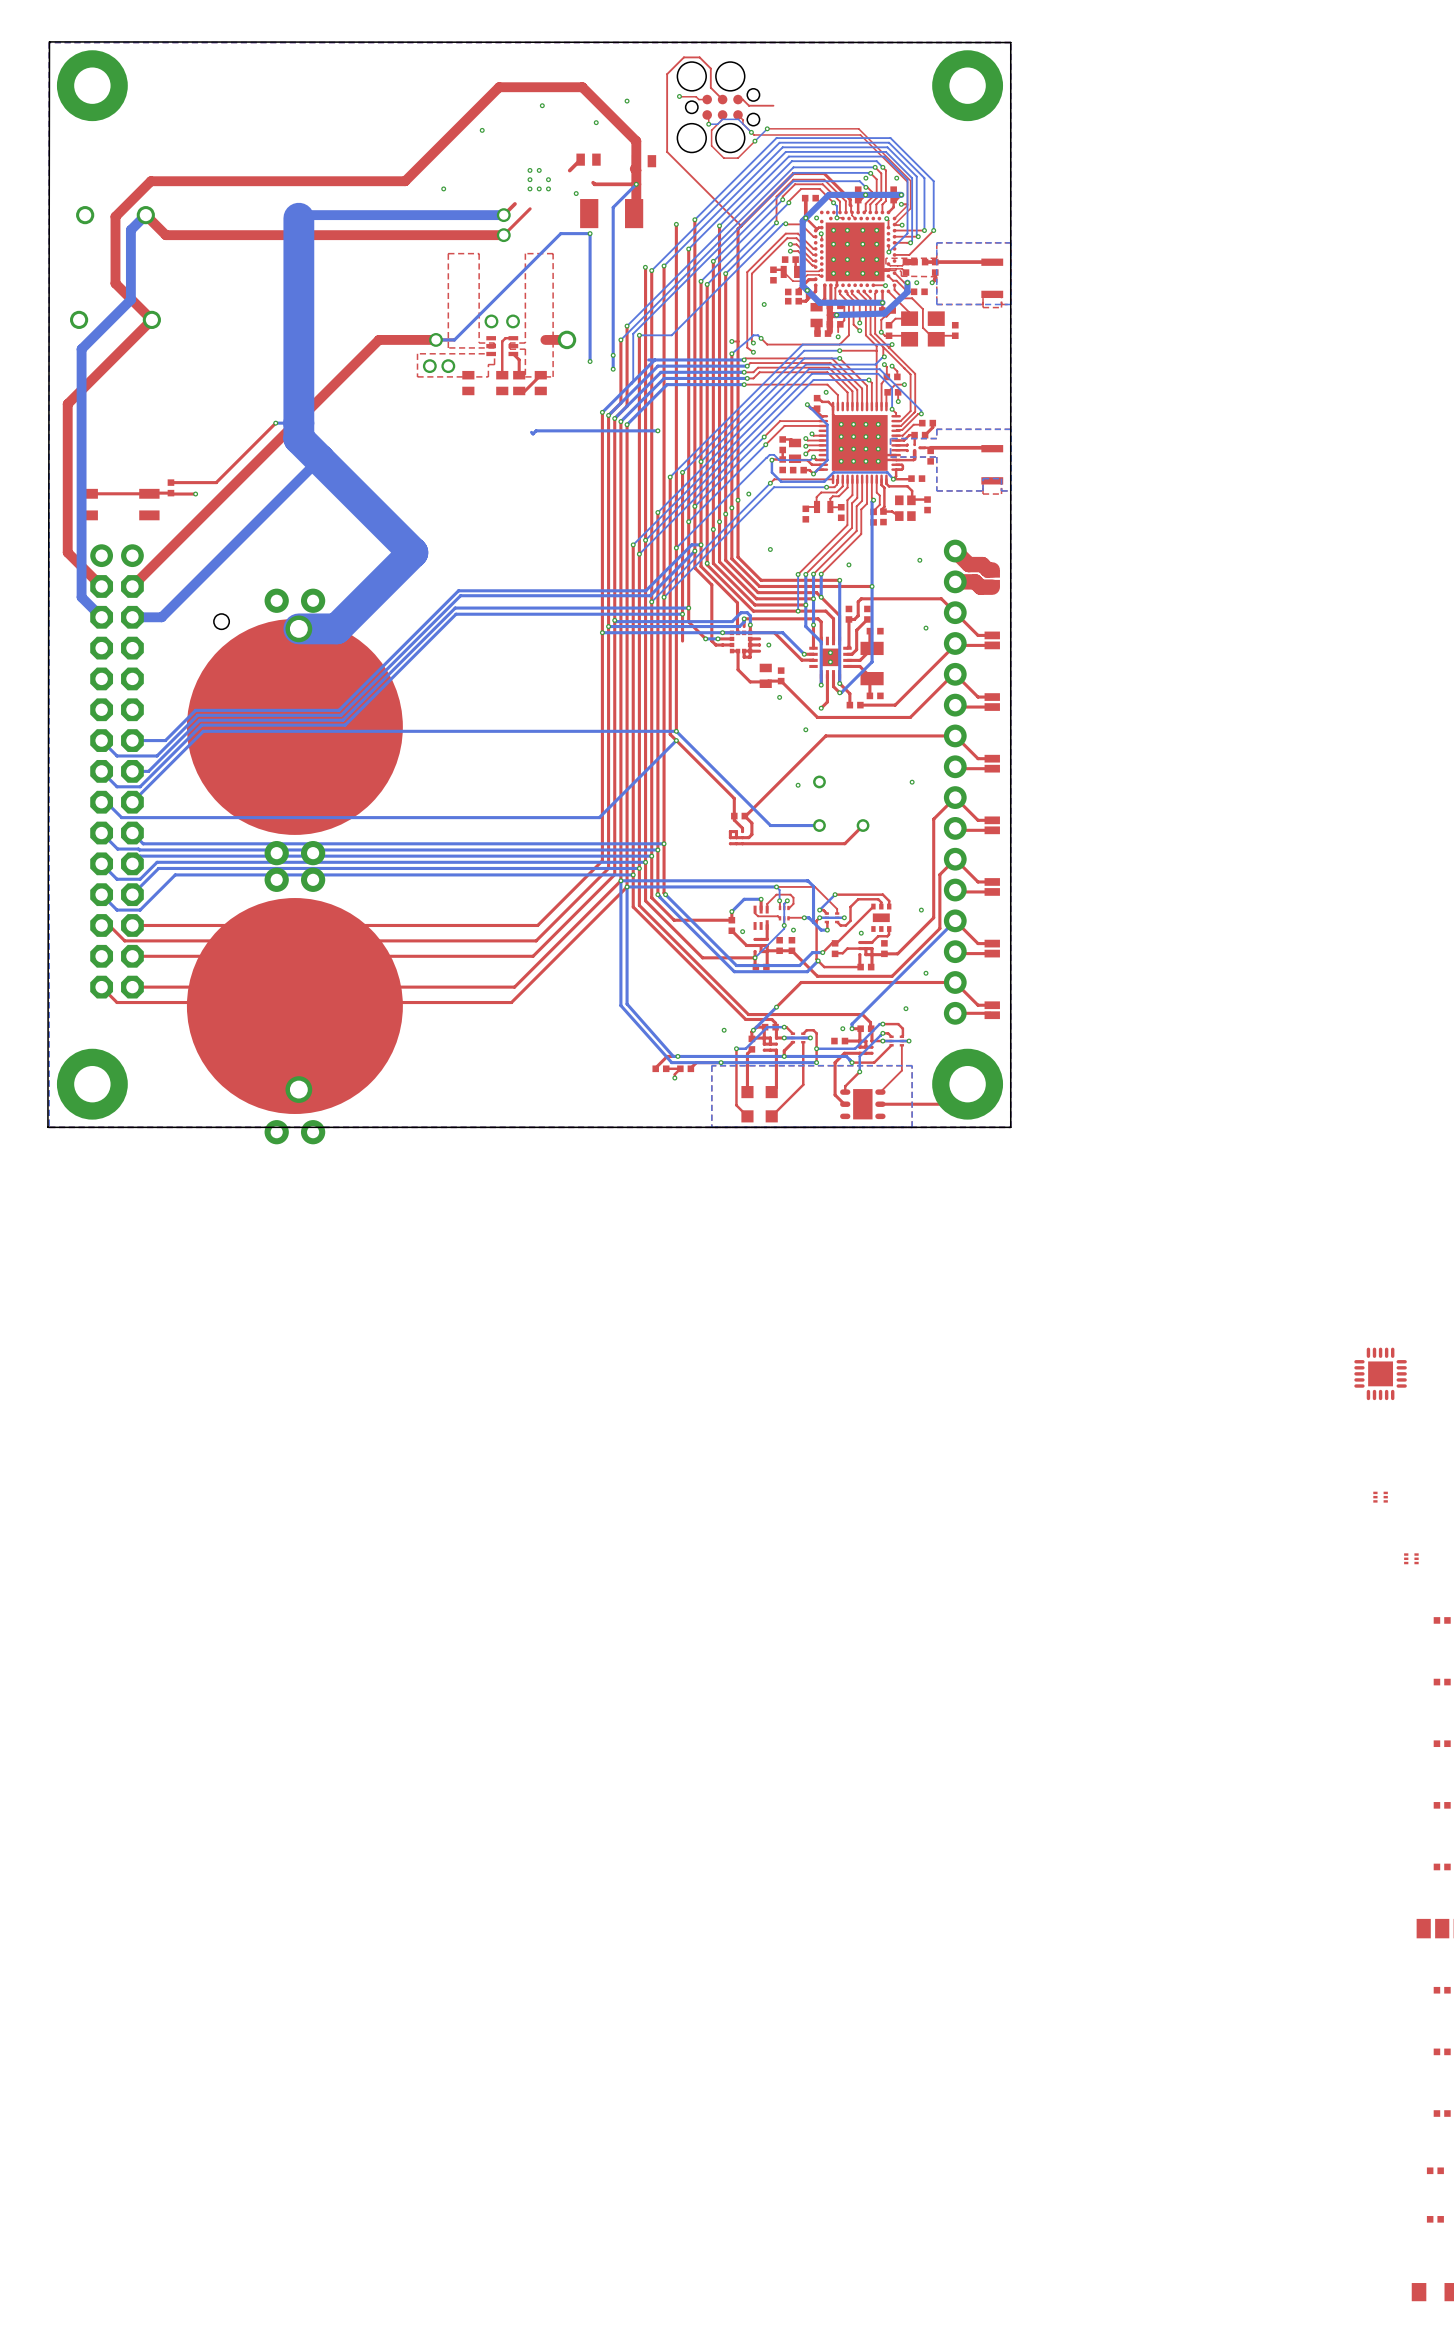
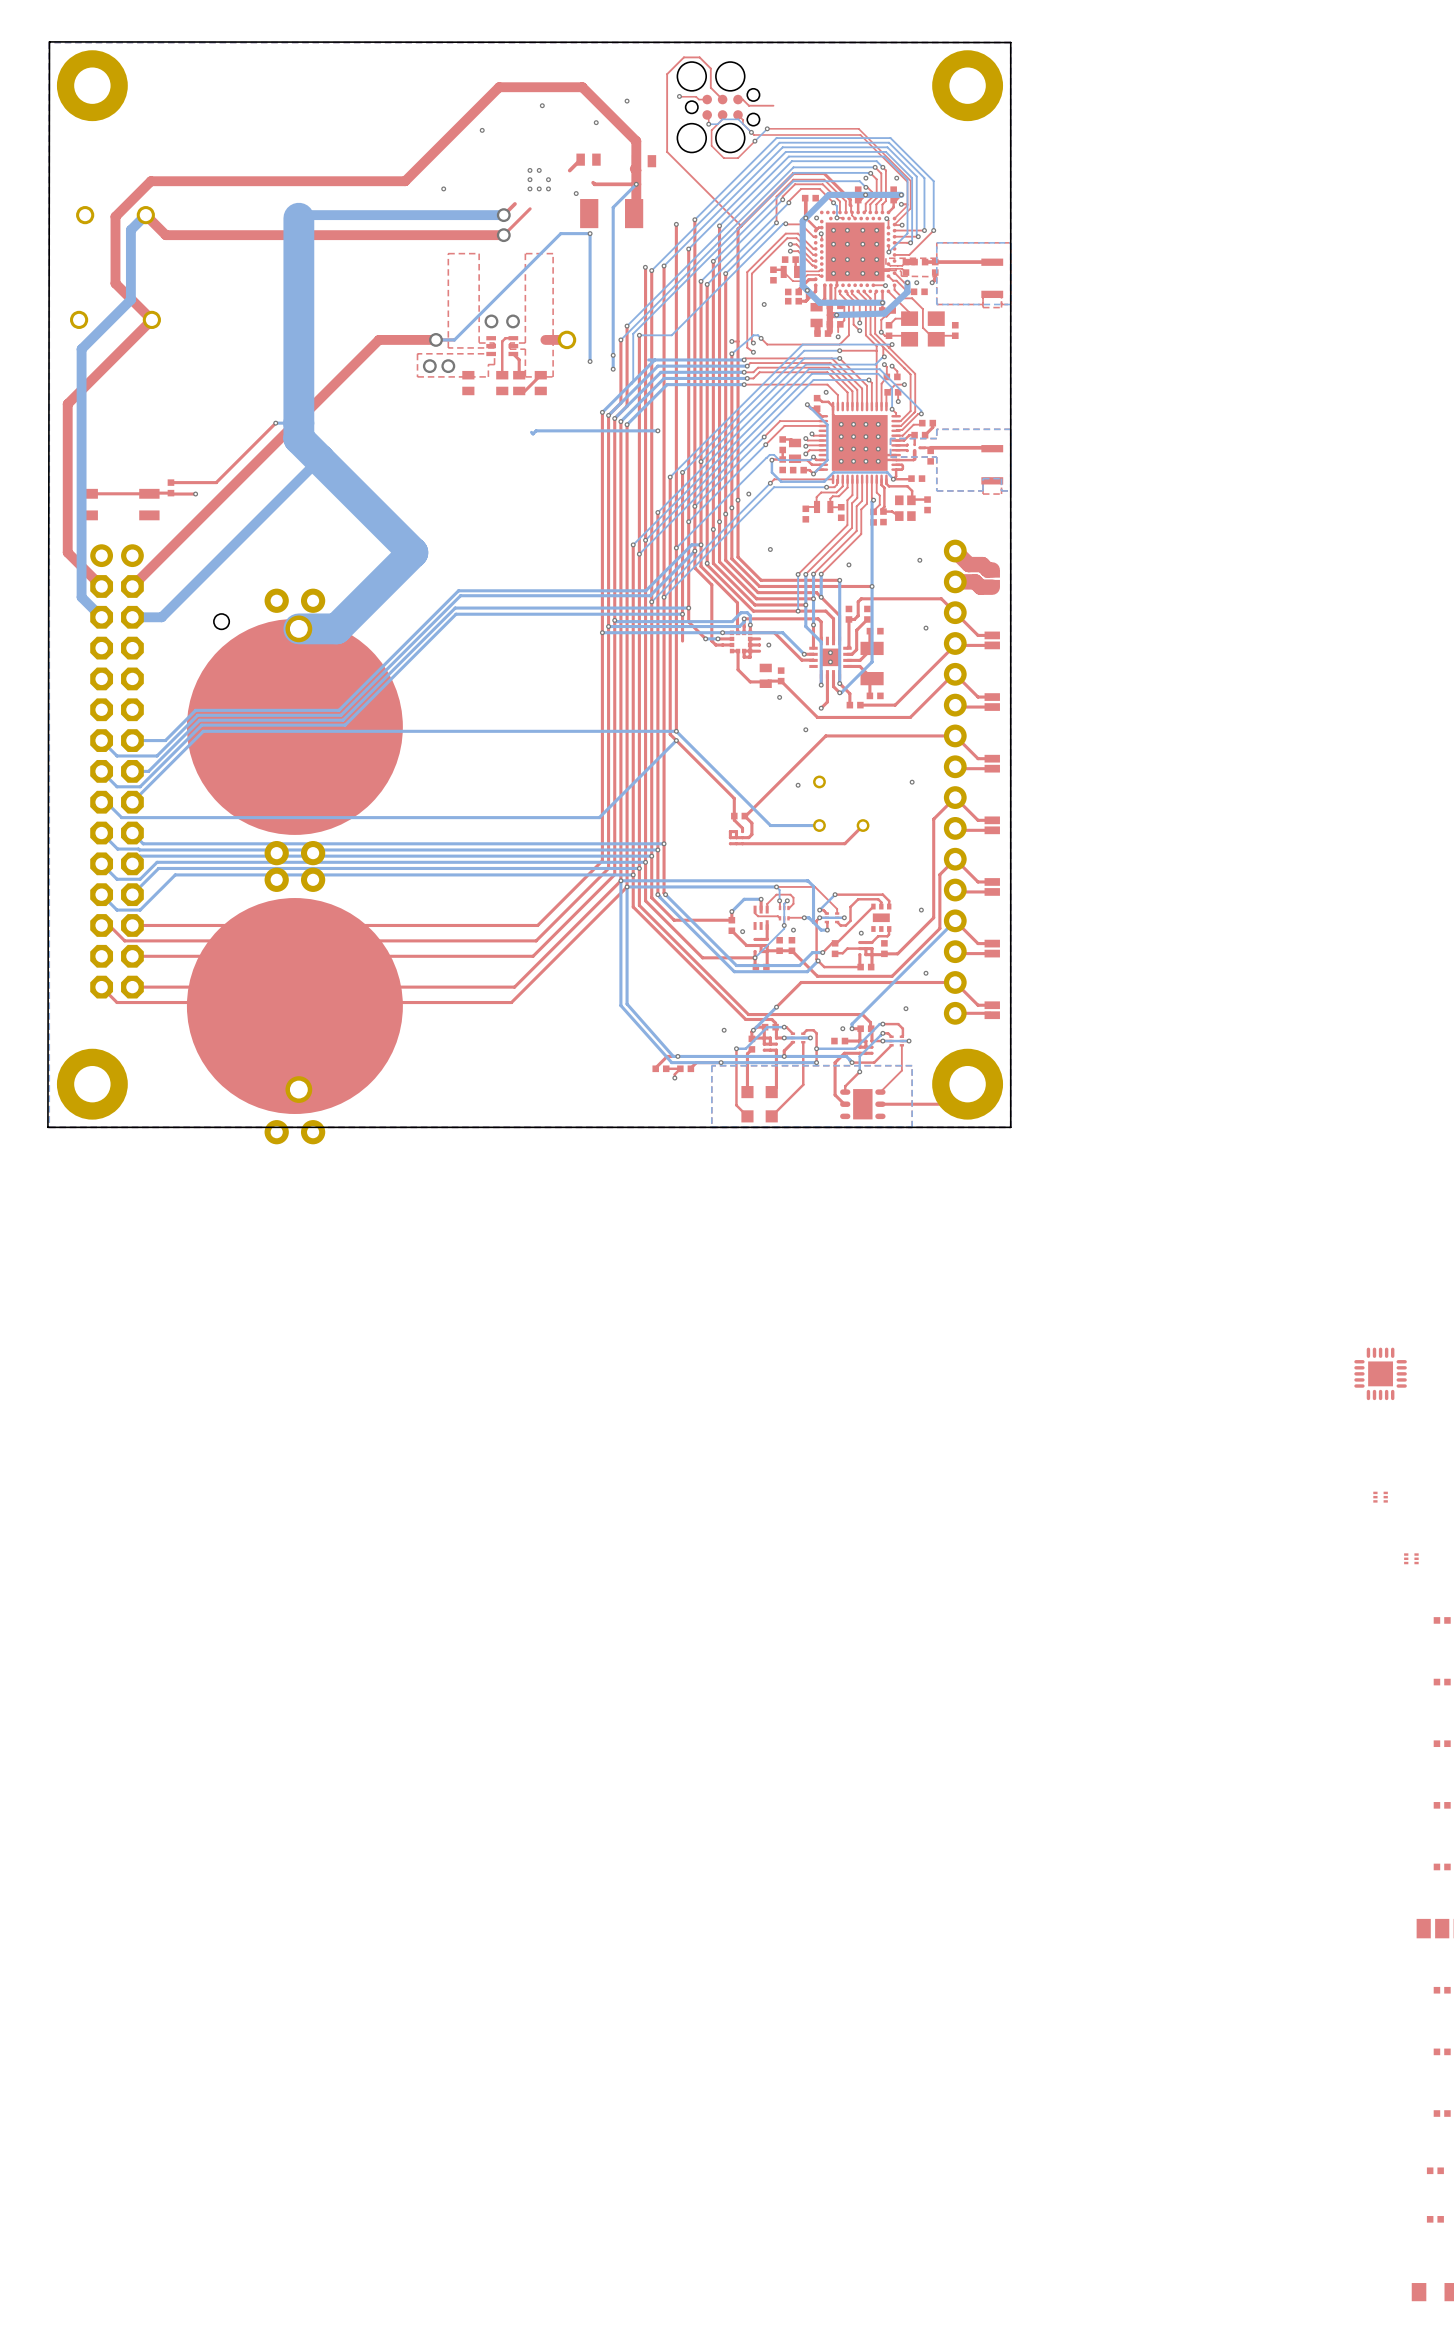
top track: none -> (744, 626) (744, 632)

